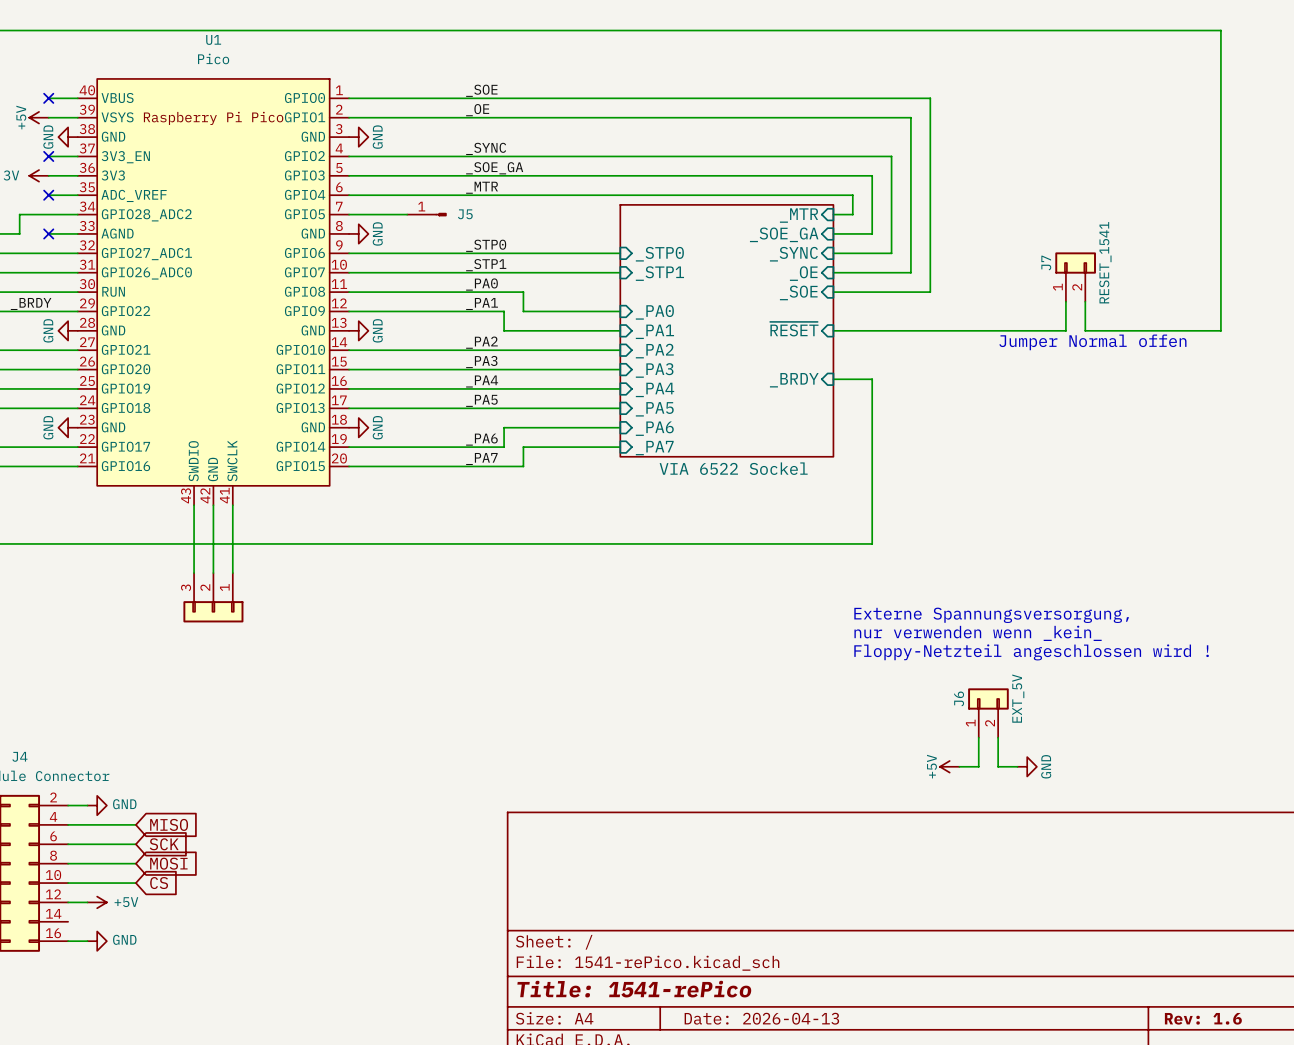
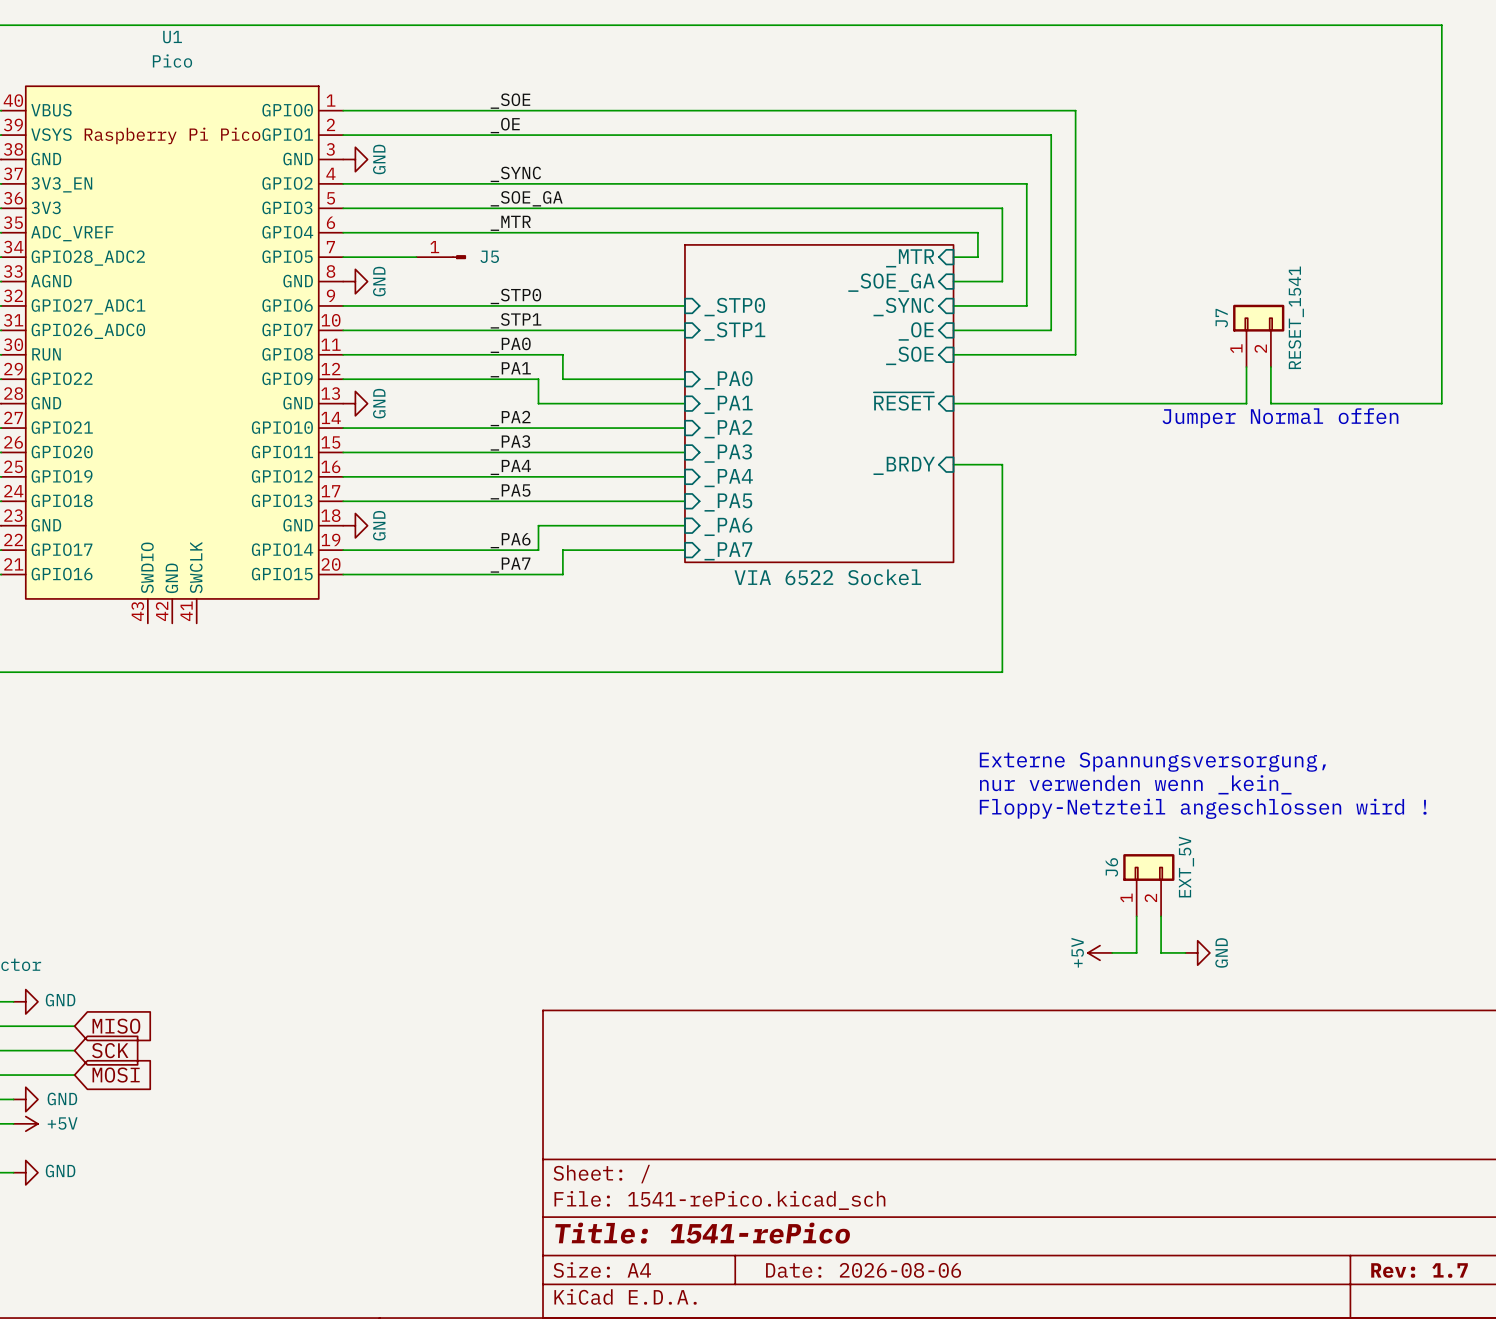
wire: (194, 505) (194, 573) -> none
wire: (213, 505) (213, 573) -> none
wire: (232, 505) (232, 573) -> none
part: (213, 597) -> none
wire: (87, 883) (135, 883) -> none
power symbol: none -> GND (25, 1099)
global label: CS (159, 883) -> none
title block: Date: 2026-04-13 (761, 1018) -> Date: 2026-08-06 (863, 1270)
title block: Rev: 1.6 (1203, 1018) -> Rev: 1.7 (1419, 1270)

